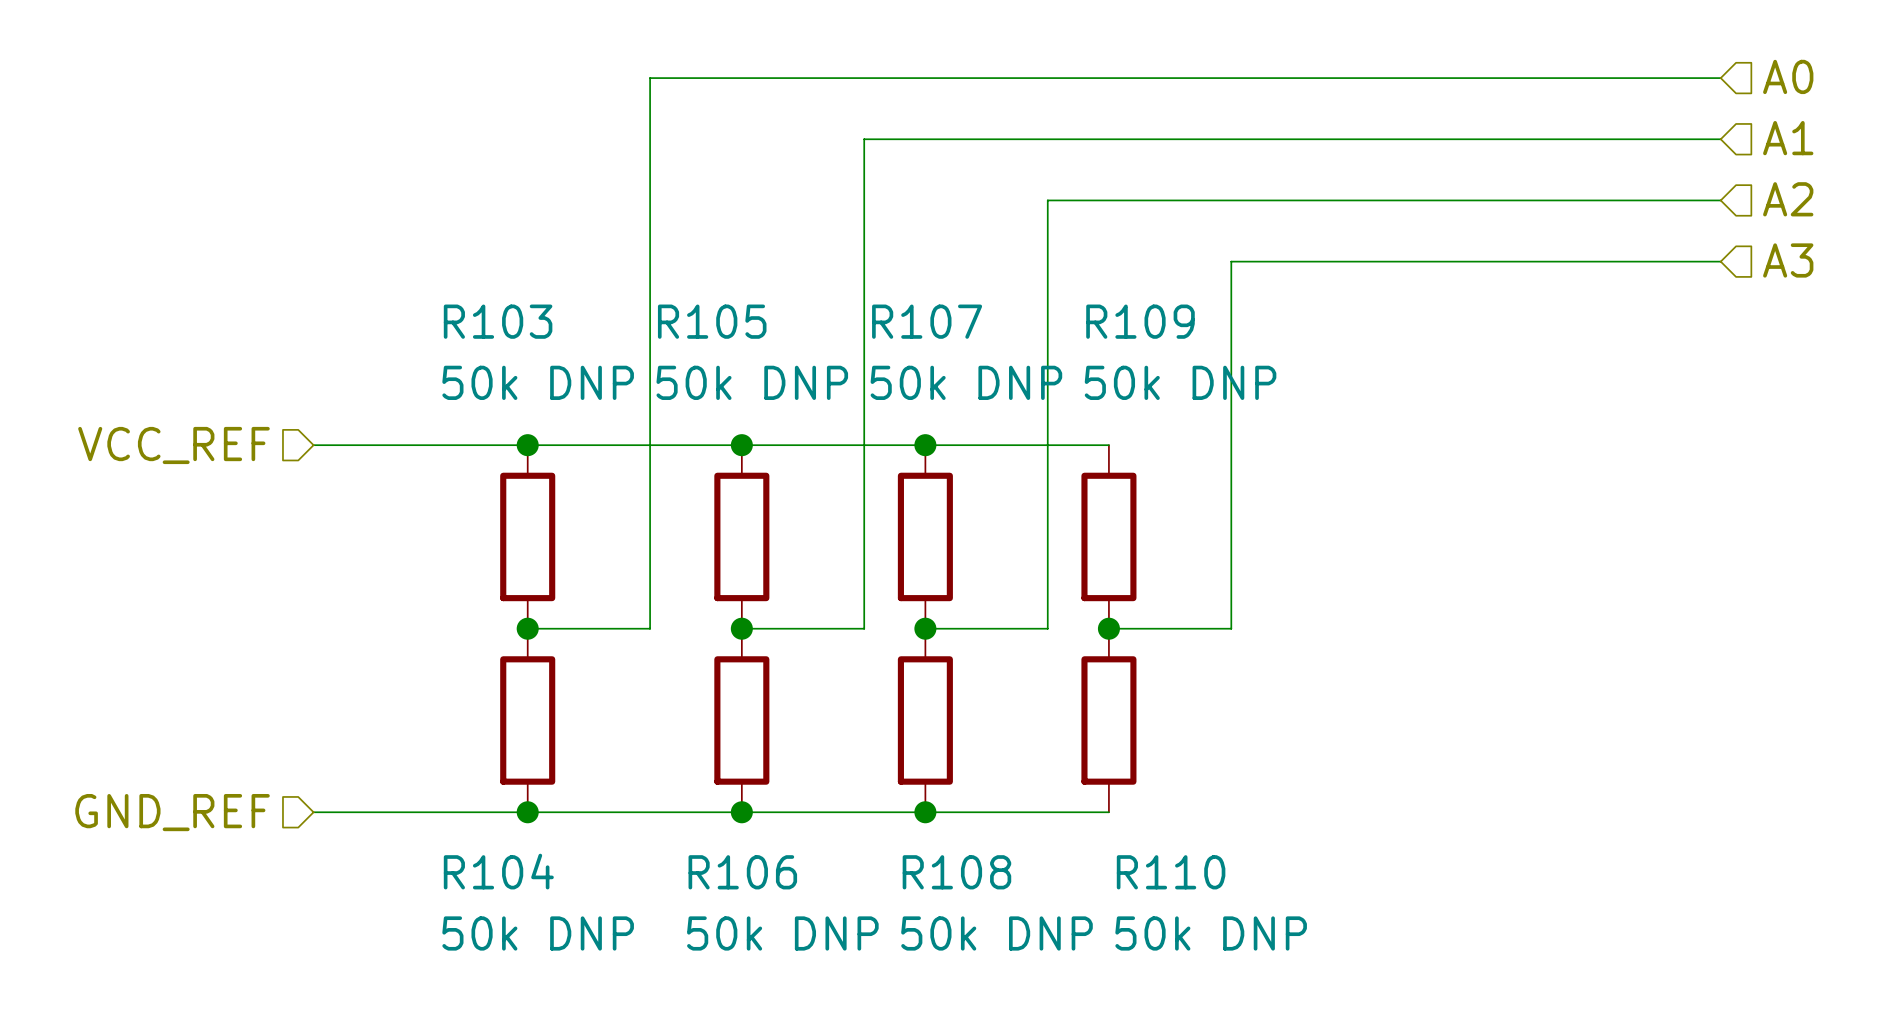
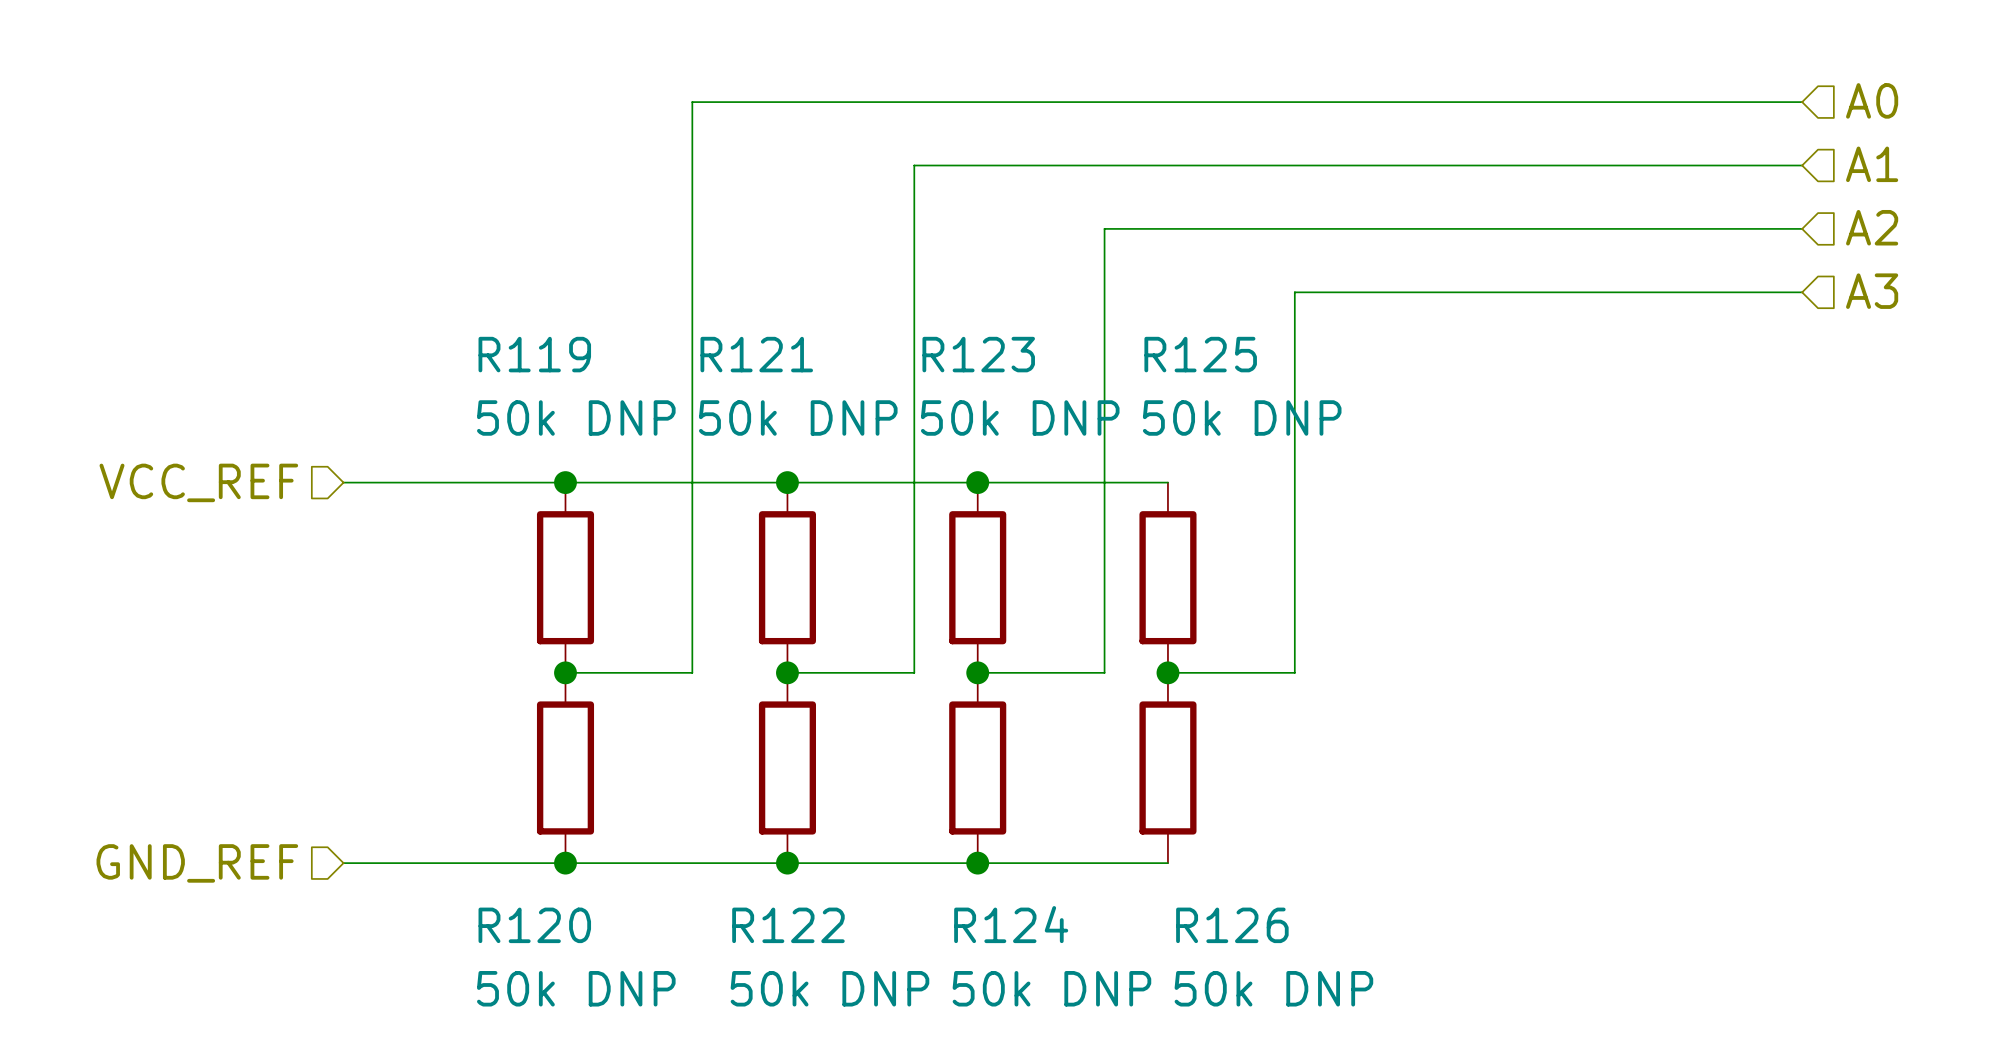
R103 name: R103 (498, 321) -> R119 (534, 354)
R105 name: R105 (712, 321) -> R121 (756, 354)
R107 name: R107 (927, 321) -> R123 (978, 354)
R109 name: R109 (1140, 321) -> R125 (1200, 354)
R104 name: R104 (498, 871) -> R120 (534, 925)
R106 name: R106 (742, 872) -> R122 (788, 925)
R108 name: R108 (956, 872) -> R124 (1011, 924)
R110 name: R110 (1171, 872) -> R126 (1232, 925)

